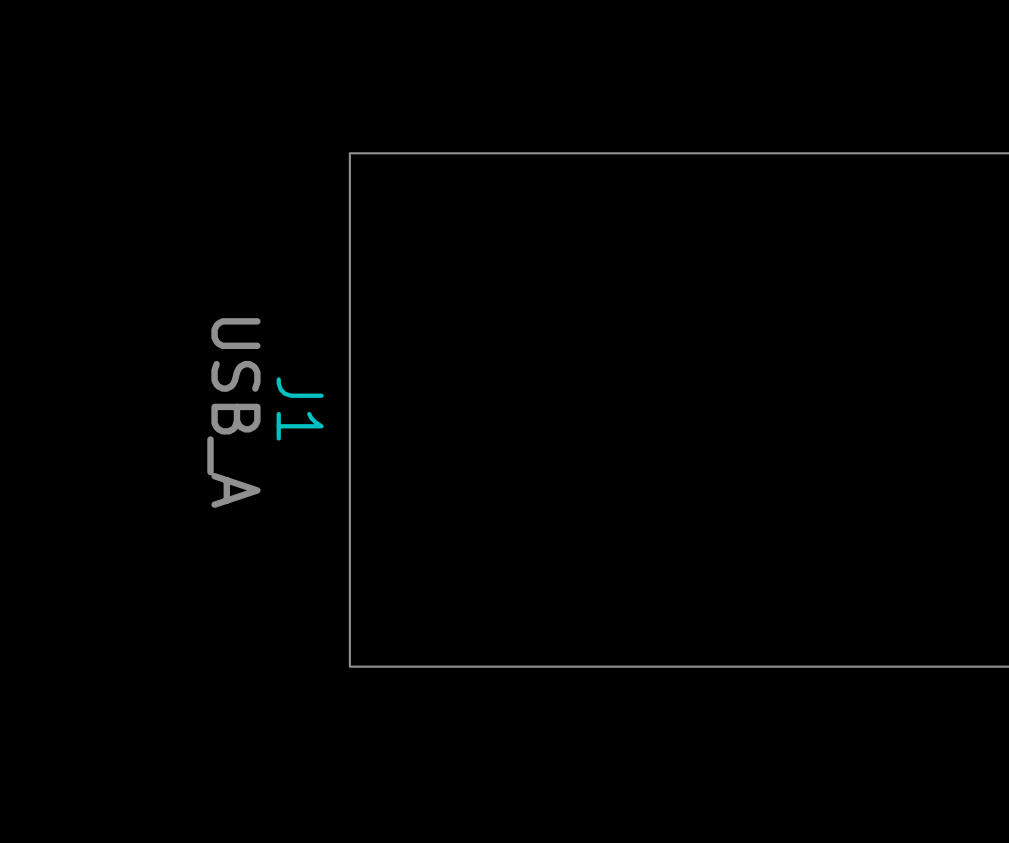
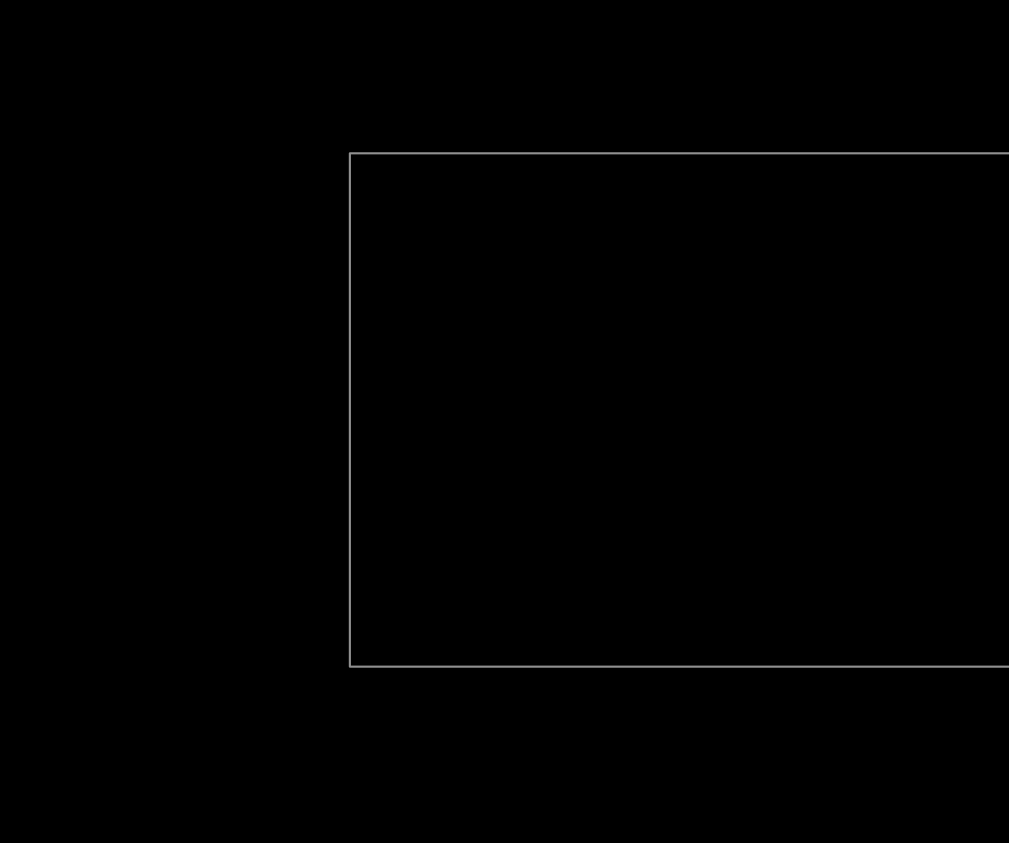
J1 name: J1 (300, 408) -> none
J1 value: USB_A (233, 413) -> none

